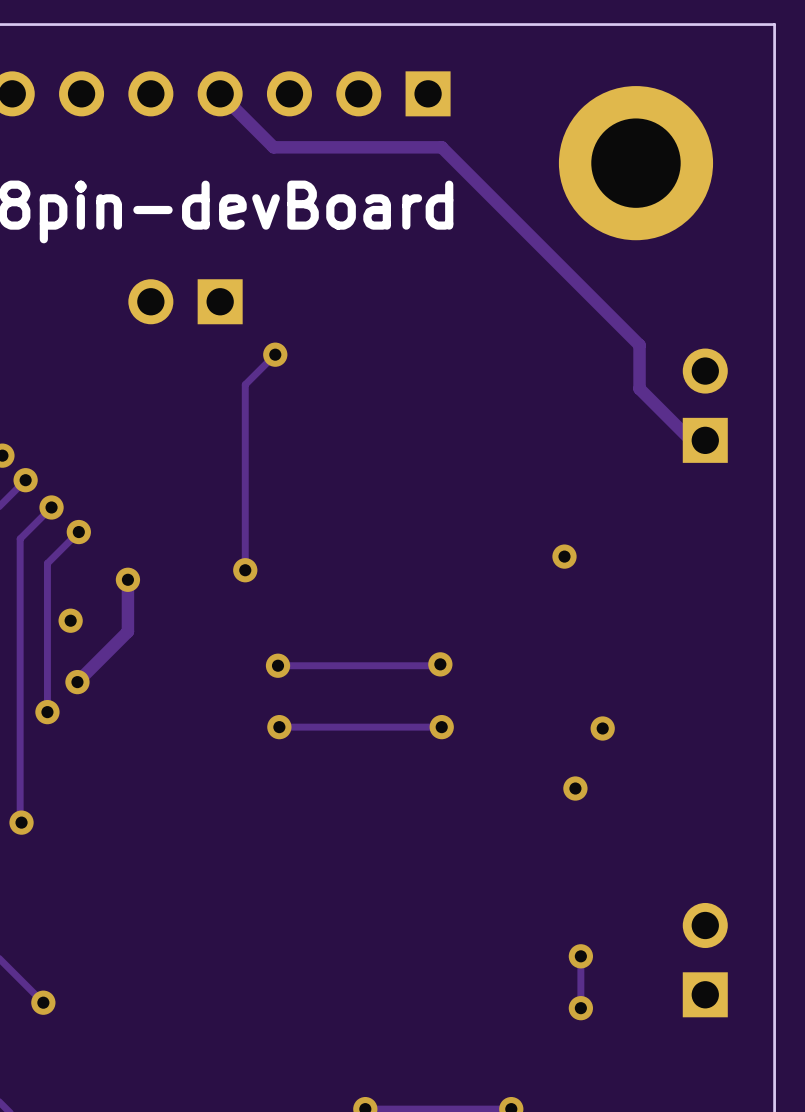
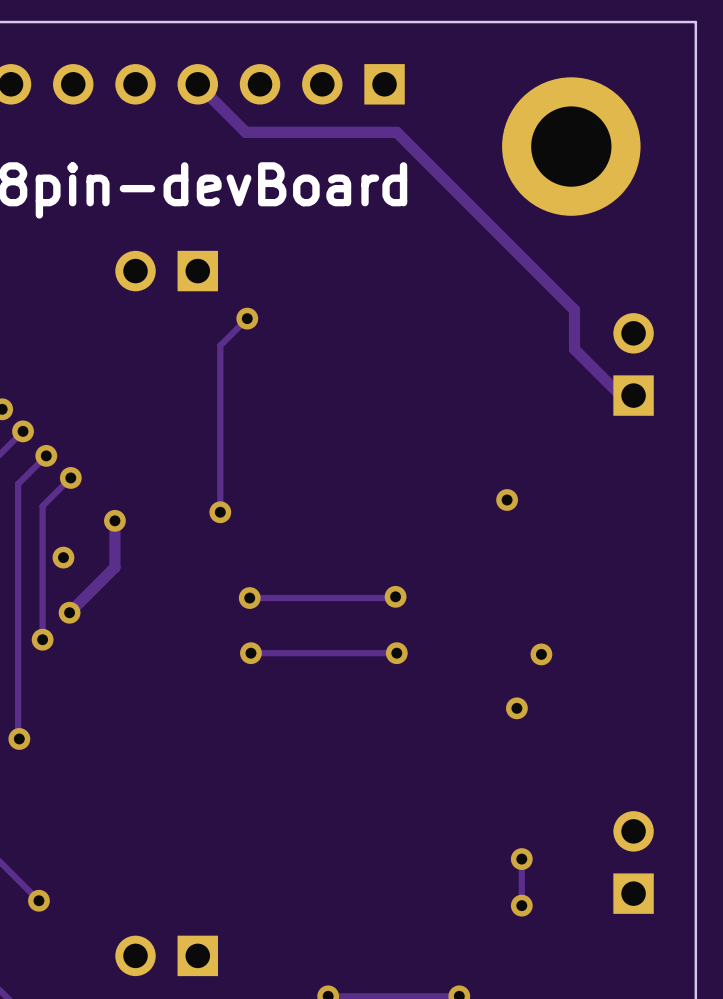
part: none -> (166, 955)

